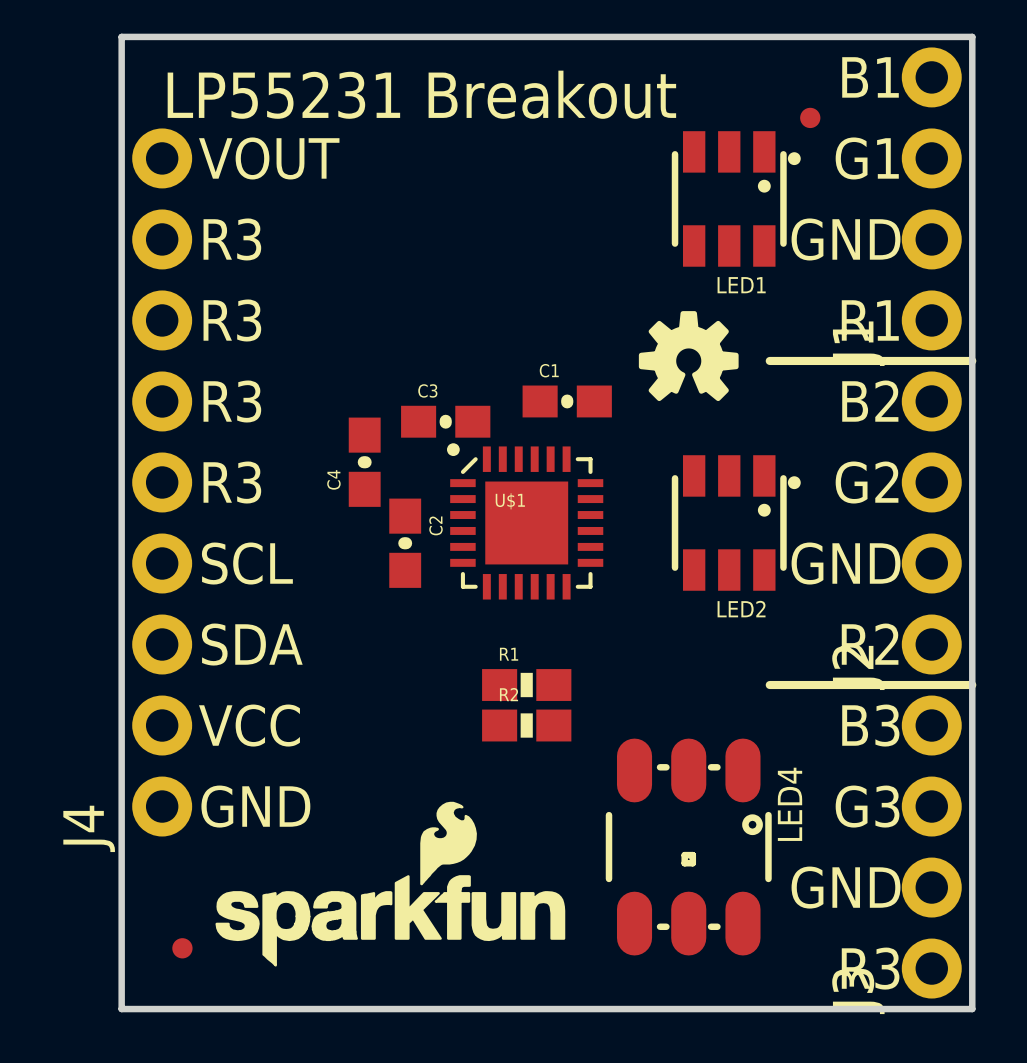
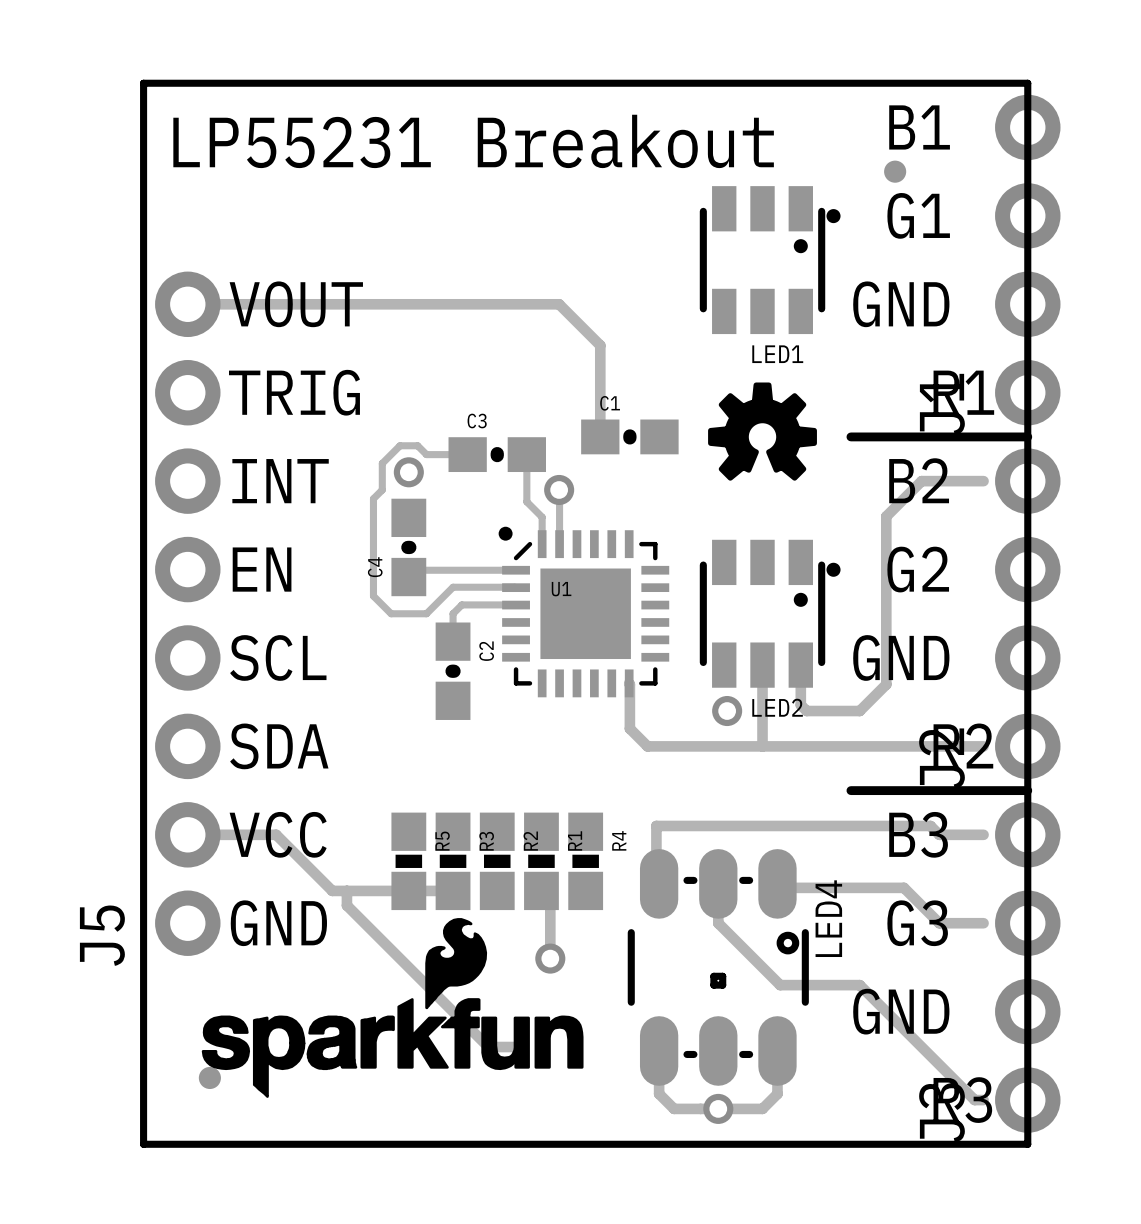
board edge: (931, 36) (972, 36) (972, 1009) (931, 1009) -> (1027, 83) (1027, 1144)
text position: B1 (870, 77) -> B1 (919, 127)
text position: LP55231 Breakout (421, 94) -> LP55231 Breakout (473, 141)
text: VOUT (269, 158) -> none
text position: G1 (867, 158) -> G1 (918, 215)
LED1 position: (736, 198) -> (770, 260)
track: none -> (187, 304) (559, 304) (600, 345) (600, 436)
text: R3 (232, 239) -> VOUT (296, 304)
text position: GND (846, 239) -> GND (901, 304)
text: R3 (232, 320) -> TRIG (294, 392)
line: (931, 360) (972, 360) -> none
track: none -> (467, 454) (426, 454) (417, 445) (399, 445) (382, 463) (382, 489) (373, 498) (373, 596) (391, 613) (426, 613) (453, 587) (516, 587)
track: none -> (526, 454) (526, 501) (542, 517) (542, 544)
via: none -> (408, 472)
text: R3 (232, 401) -> INT (280, 481)
C1 position: (567, 401) -> (629, 436)
text position: B2 (870, 401) -> B2 (919, 480)
track: none -> (983, 481) (921, 481) (886, 516) (886, 684) (859, 711) (806, 711) (800, 705) (800, 665)
track: none -> (559, 490) (559, 544)
via: none -> (559, 489)
C3 position: (445, 421) -> (497, 454)
J4: (162, 482) -> none
text: R3 (232, 482) -> EN (262, 569)
text position: G2 (867, 482) -> G2 (918, 569)
track: none -> (516, 570) (415, 570) (408, 577)
U$1 name: U$1 (510, 501) -> U1 (561, 589)
track: none -> (516, 605) (461, 604) (453, 613) (453, 641)
J5: none -> (187, 613)
LED2 position: (736, 522) -> (770, 613)
C2 position: (405, 543) -> (453, 671)
text position: GND (846, 563) -> GND (901, 657)
track: none -> (762, 665) (762, 746)
track: none -> (629, 683) (629, 728) (647, 746) (983, 746)
via: none -> (727, 711)
R1 rotation: 0° (526, 685) -> 90° clockwise (541, 861)
R1 position: (526, 685) -> (541, 861)
line: (931, 685) (972, 685) -> none
track: none -> (187, 834) (276, 834) (332, 890) (453, 890)
R2 rotation: 0° (526, 725) -> 90° clockwise (497, 861)
R2 position: (526, 725) -> (497, 861)
text position: B3 (870, 725) -> B3 (918, 834)
track: none -> (983, 834) (939, 834) (930, 825) (656, 825) (656, 879) (659, 883)
R5: none -> (408, 861)
R3: none -> (453, 861)
R4: none -> (585, 861)
track: none -> (718, 883) (718, 923) (780, 985) (859, 985) (974, 1100) (983, 1100)
track: none -> (780, 887) (903, 887) (939, 923) (983, 923)
track: none -> (346, 890) (346, 905) (488, 1047) (514, 1047)
track: none -> (541, 890) (550, 899) (550, 958)
text position: G3 (867, 806) -> G3 (917, 923)
via: none -> (550, 958)
LED4 position: (688, 847) -> (718, 967)
drawing position: (390, 884) -> (392, 1007)
text position: GND (846, 887) -> GND (901, 1011)
track: none -> (659, 1050) (659, 1093) (674, 1108) (762, 1108) (777, 1093) (777, 1050)
via: none -> (718, 1108)

